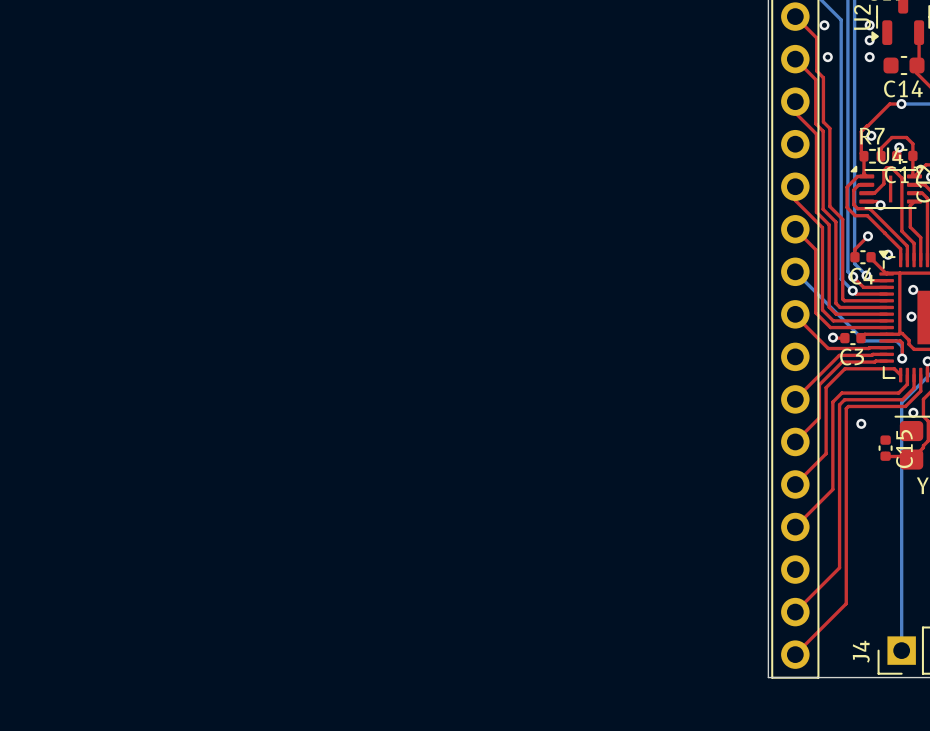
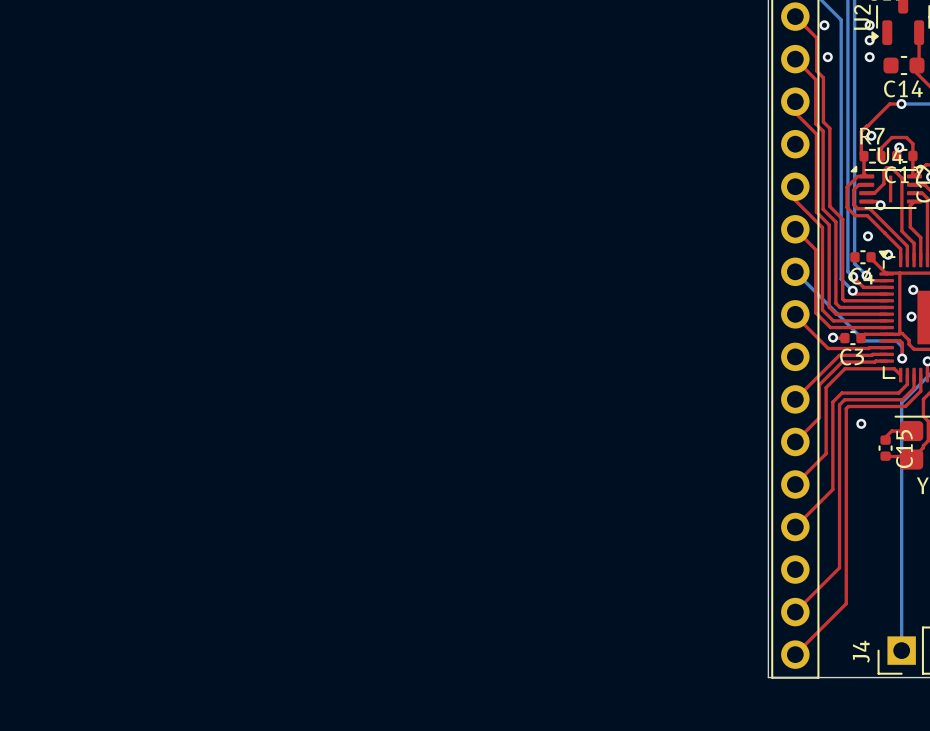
top track: (868, 236) (854, 249) (854, 257) -> none
via: (913, 412) -> none
top track: none -> (911, 431) (891, 431) (885, 437)

